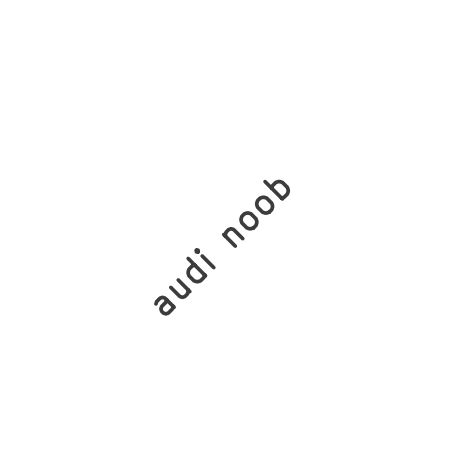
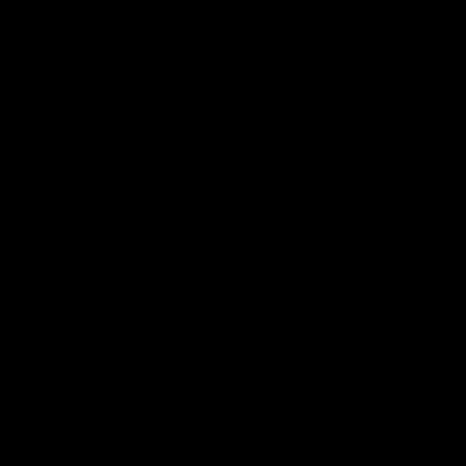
text: audi noob (222, 247) -> none

